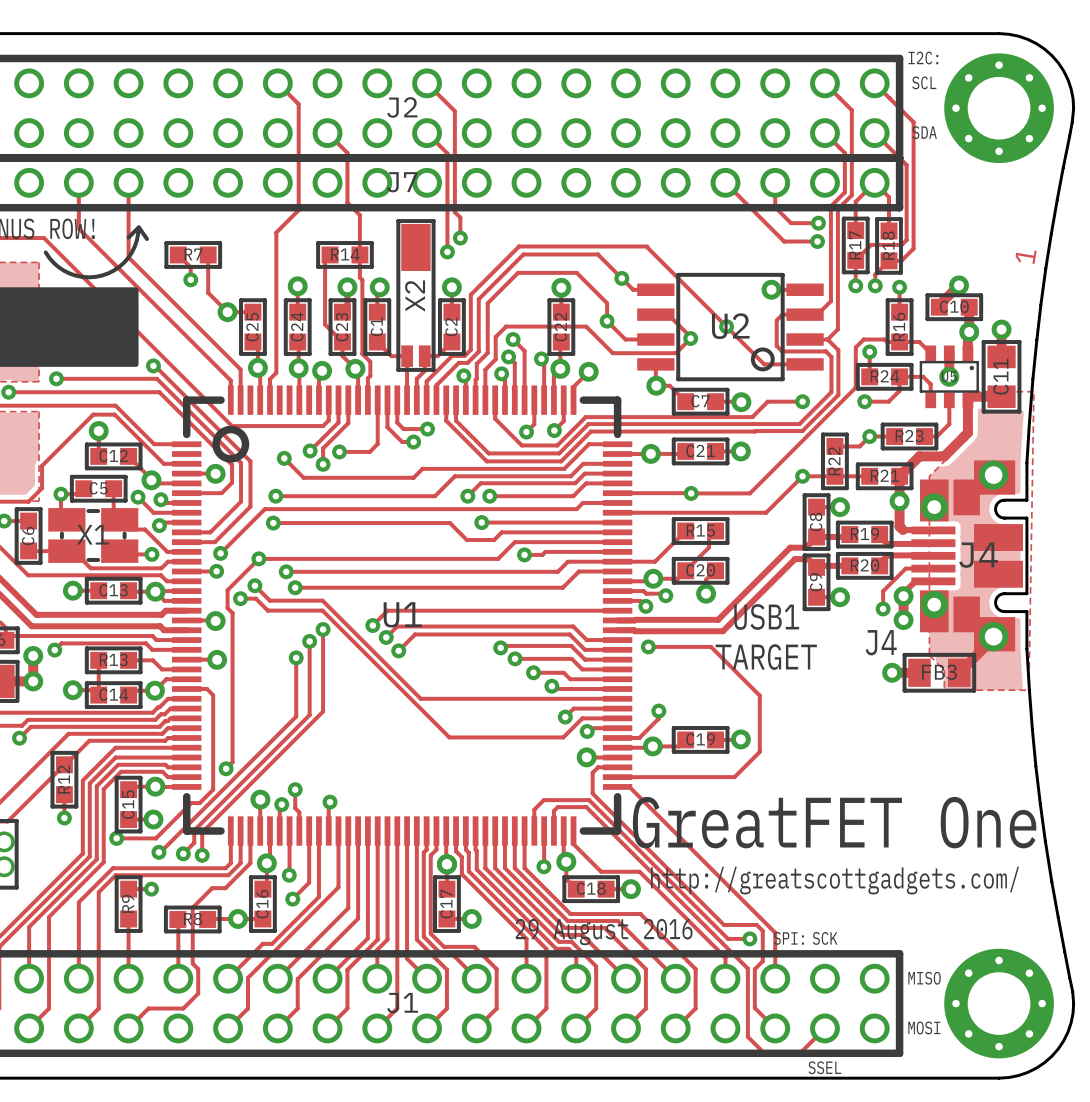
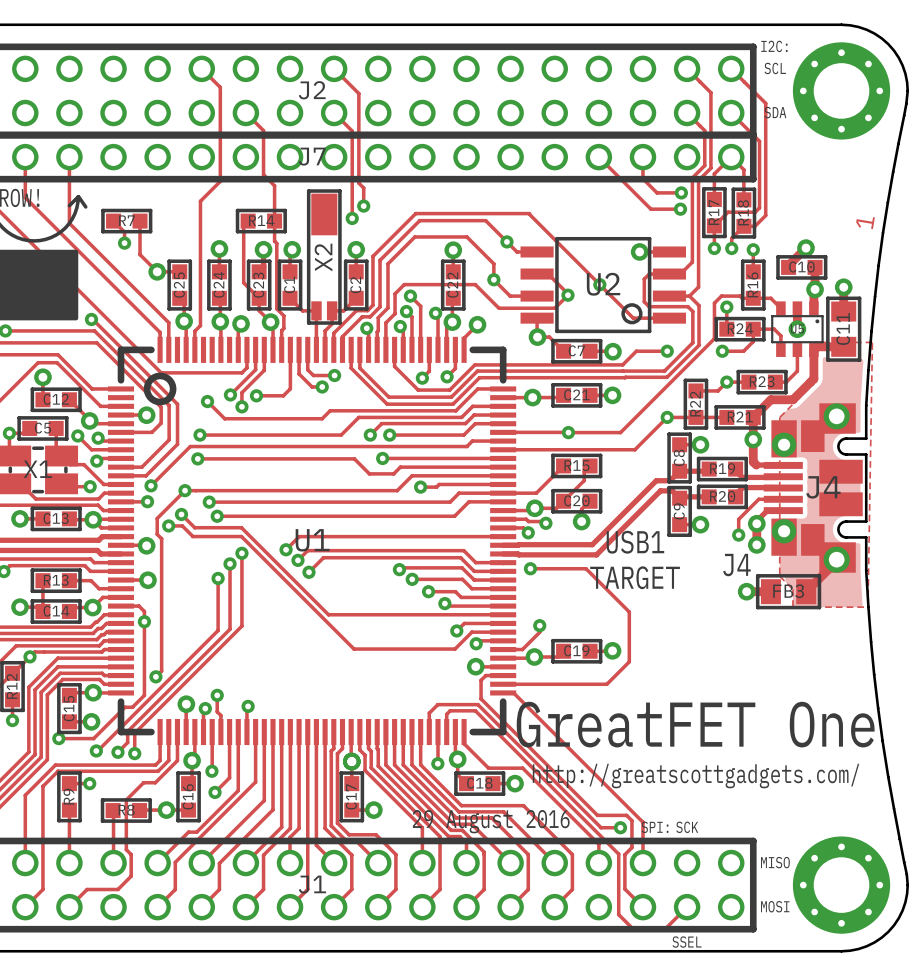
via: none -> (144, 621)
via: none -> (30, 656)

